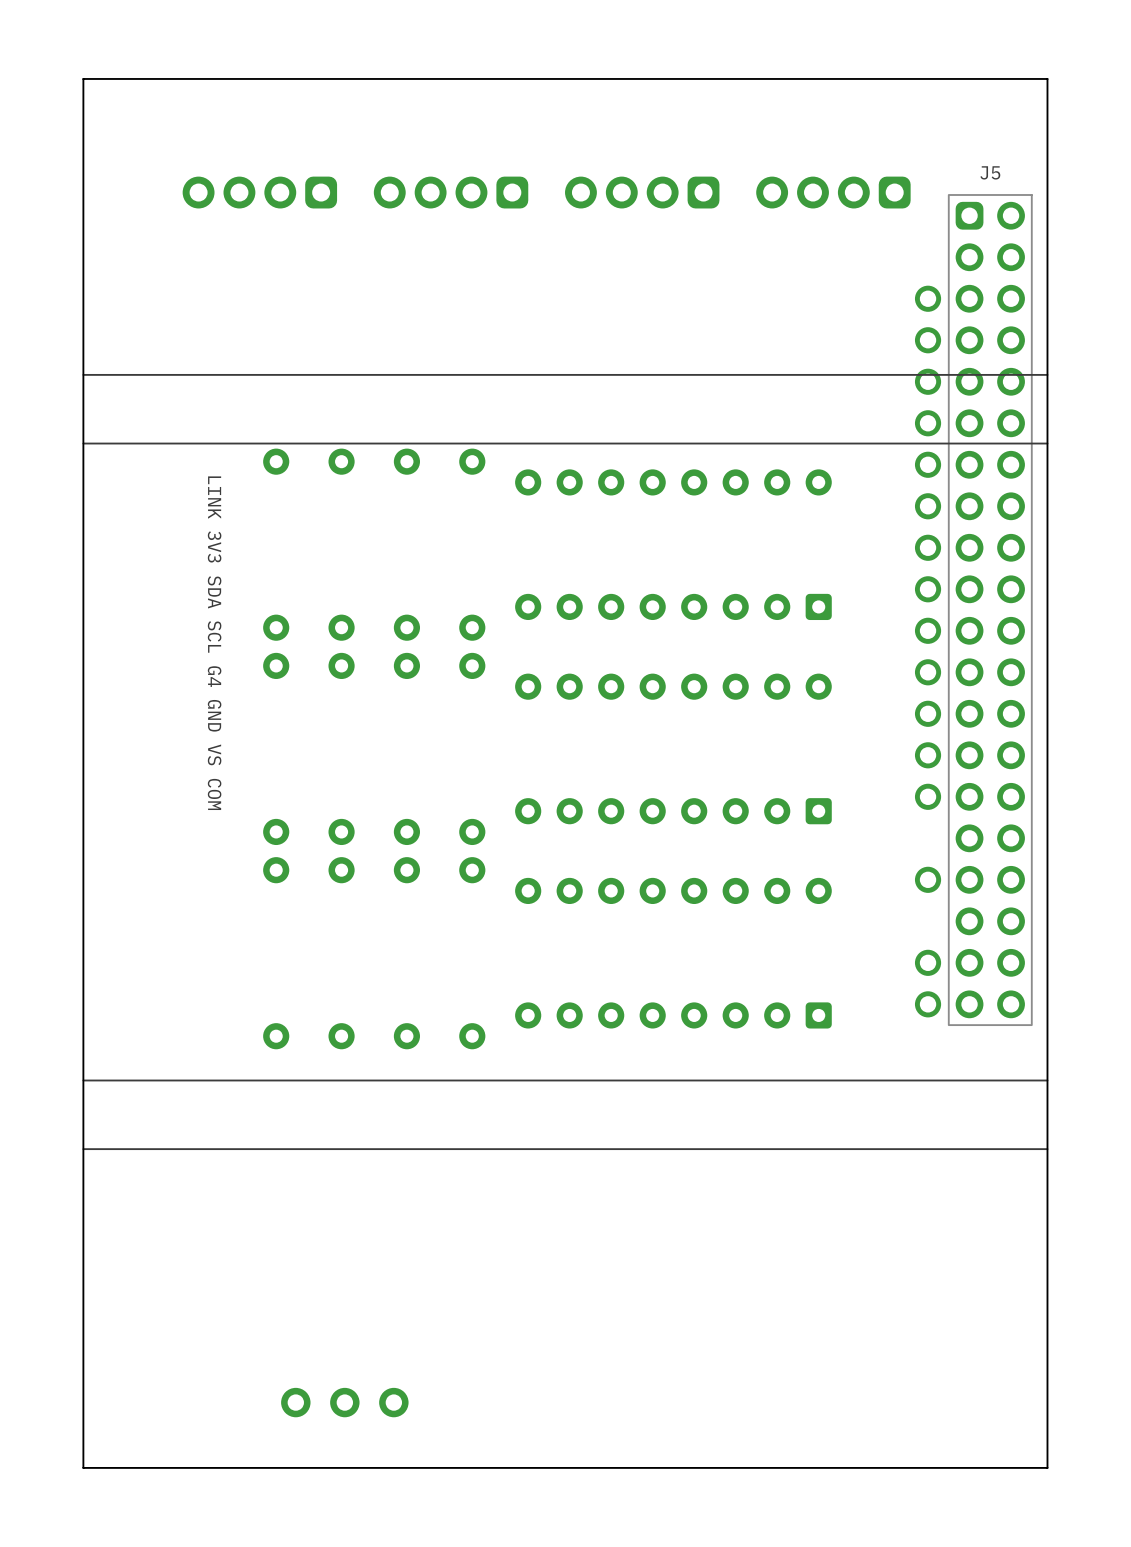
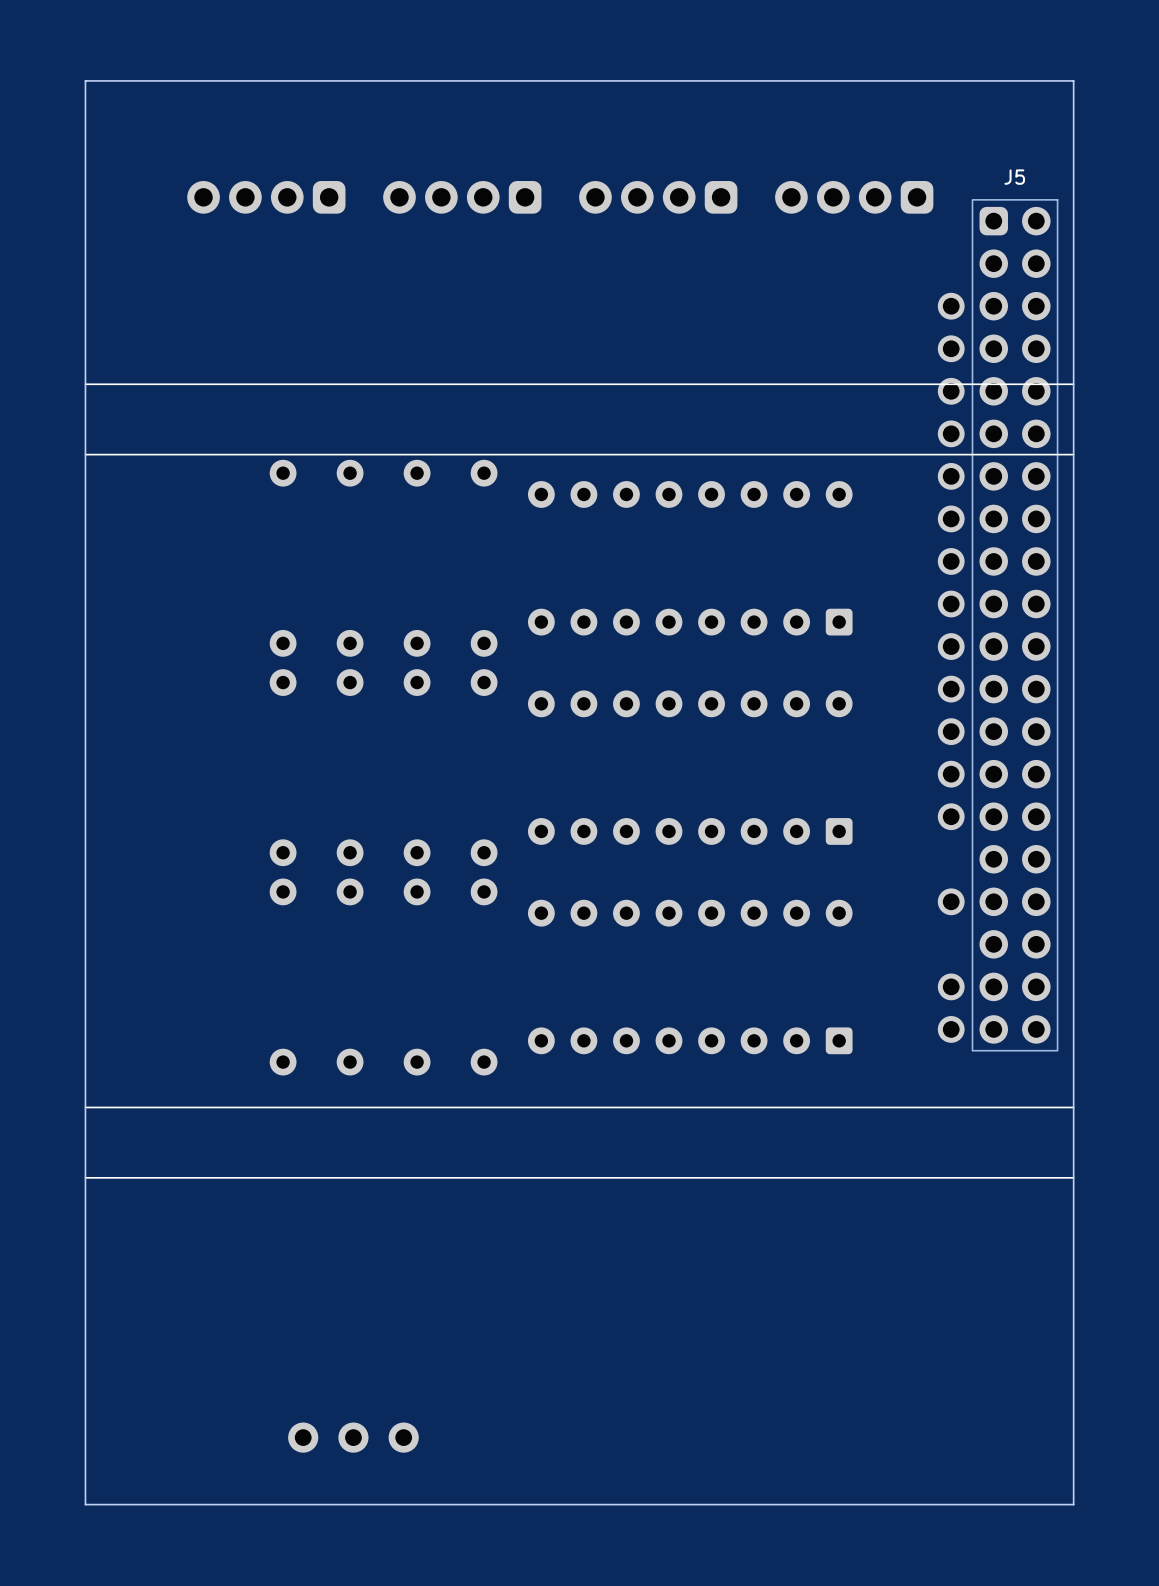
text: LINK 3V3 SDA SCL G4 GND VS COM (214, 643) -> none

